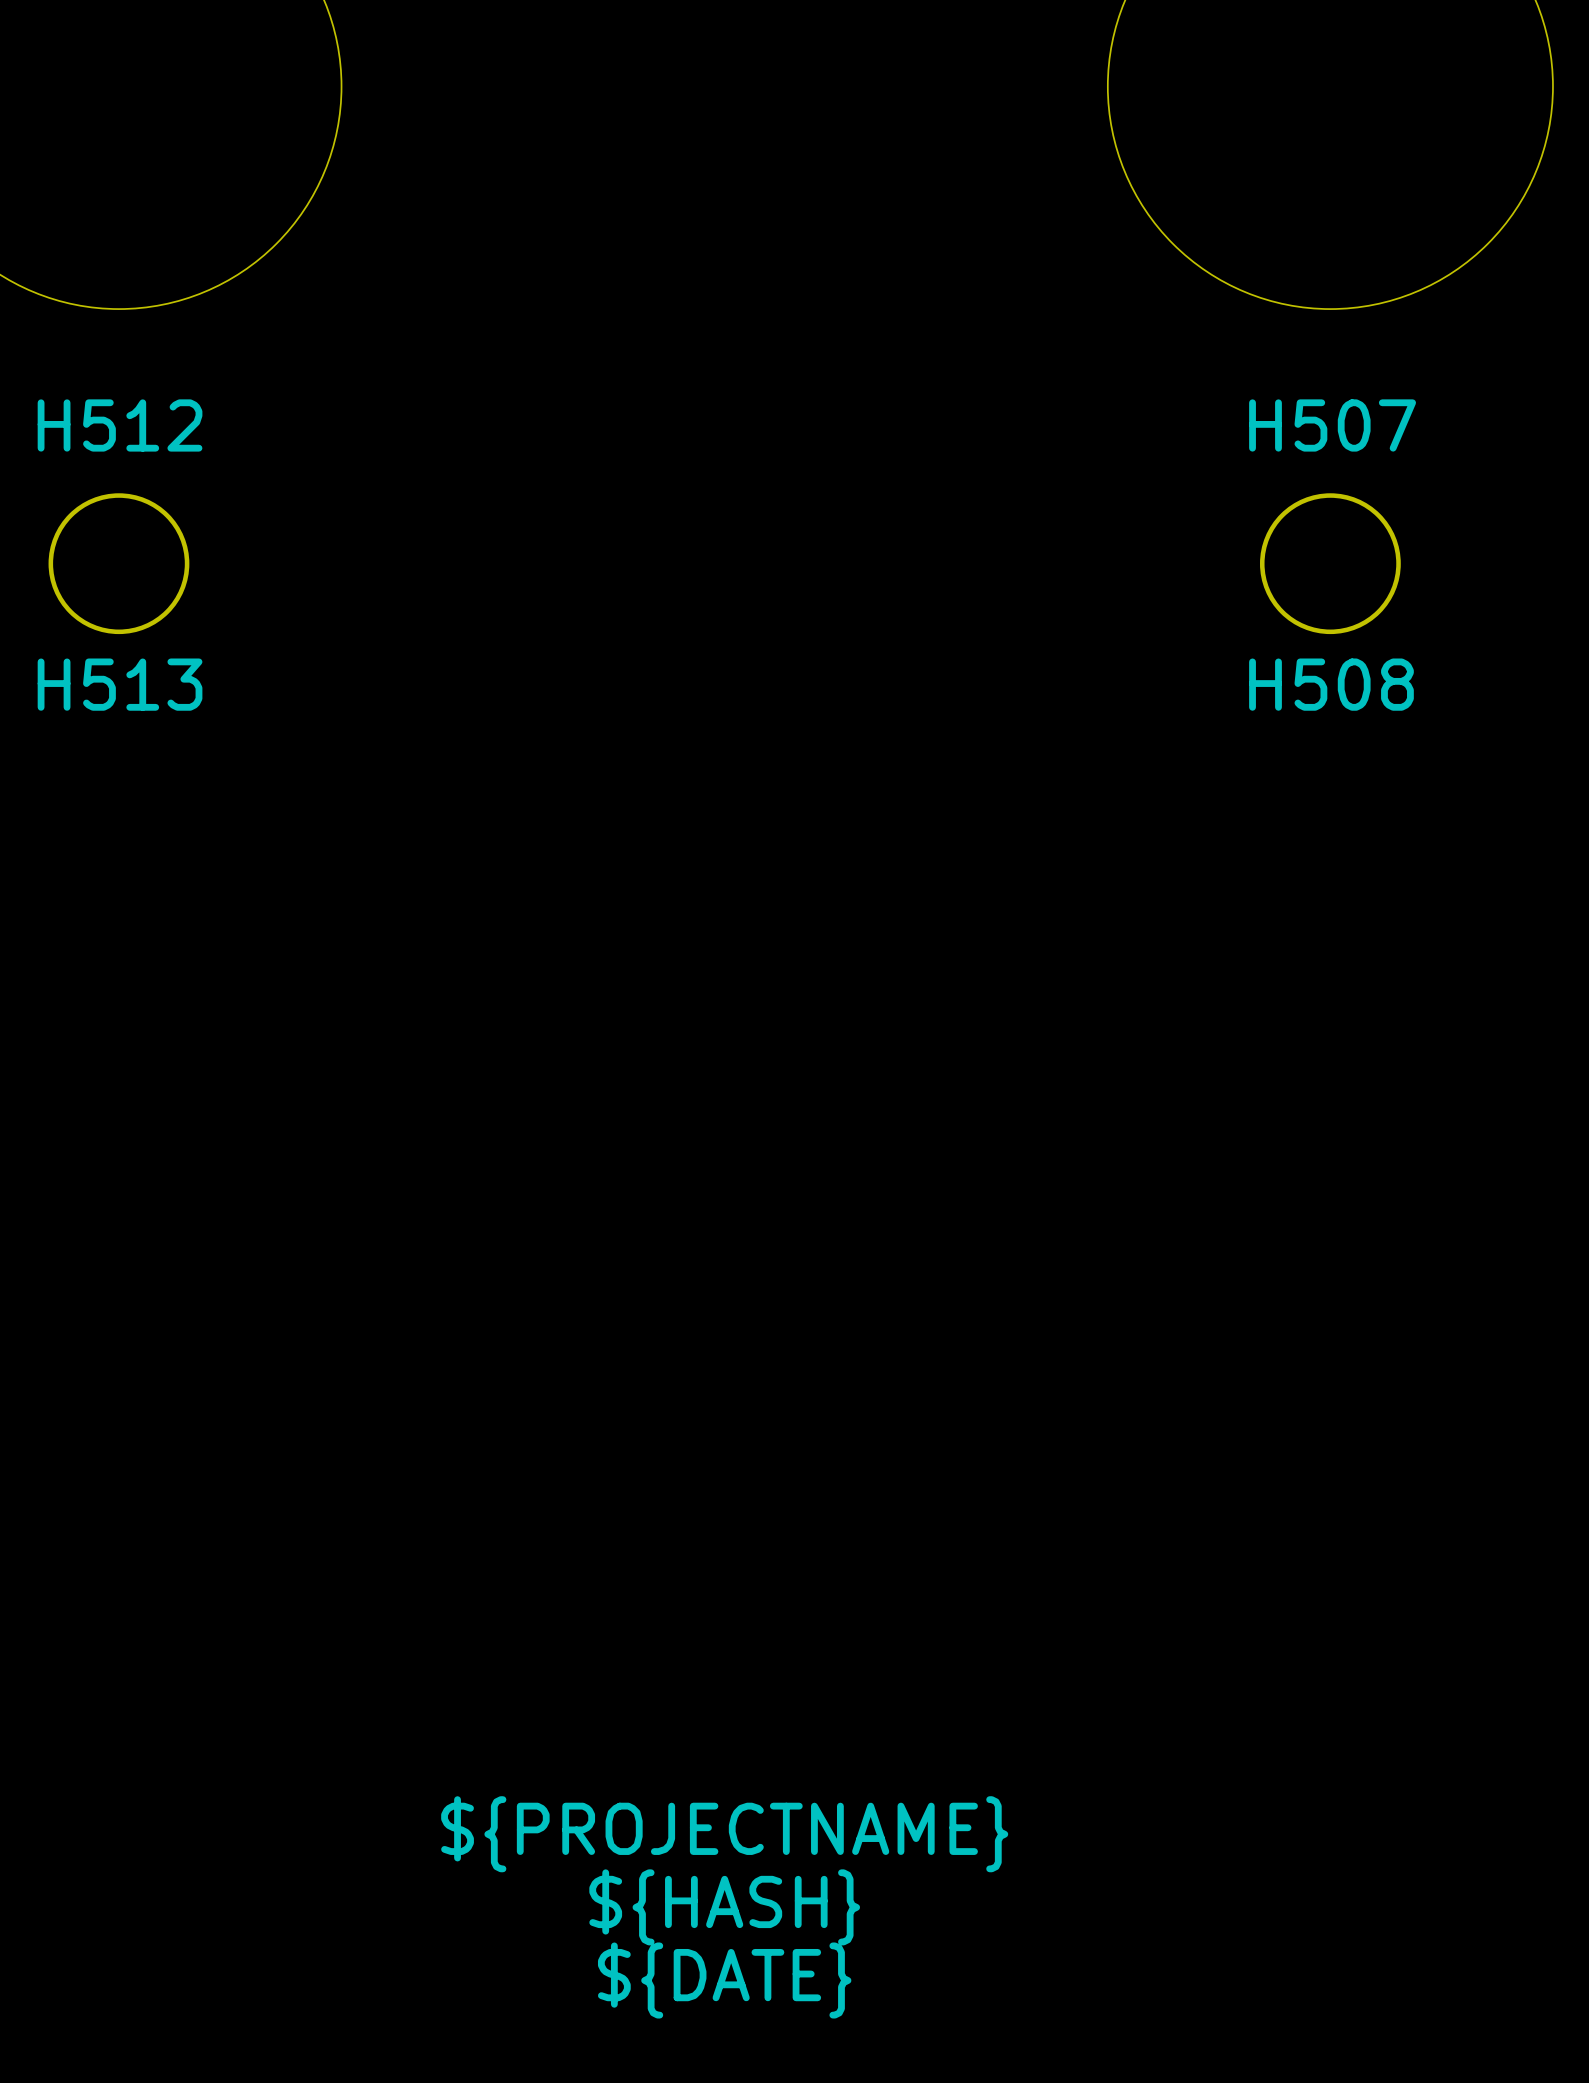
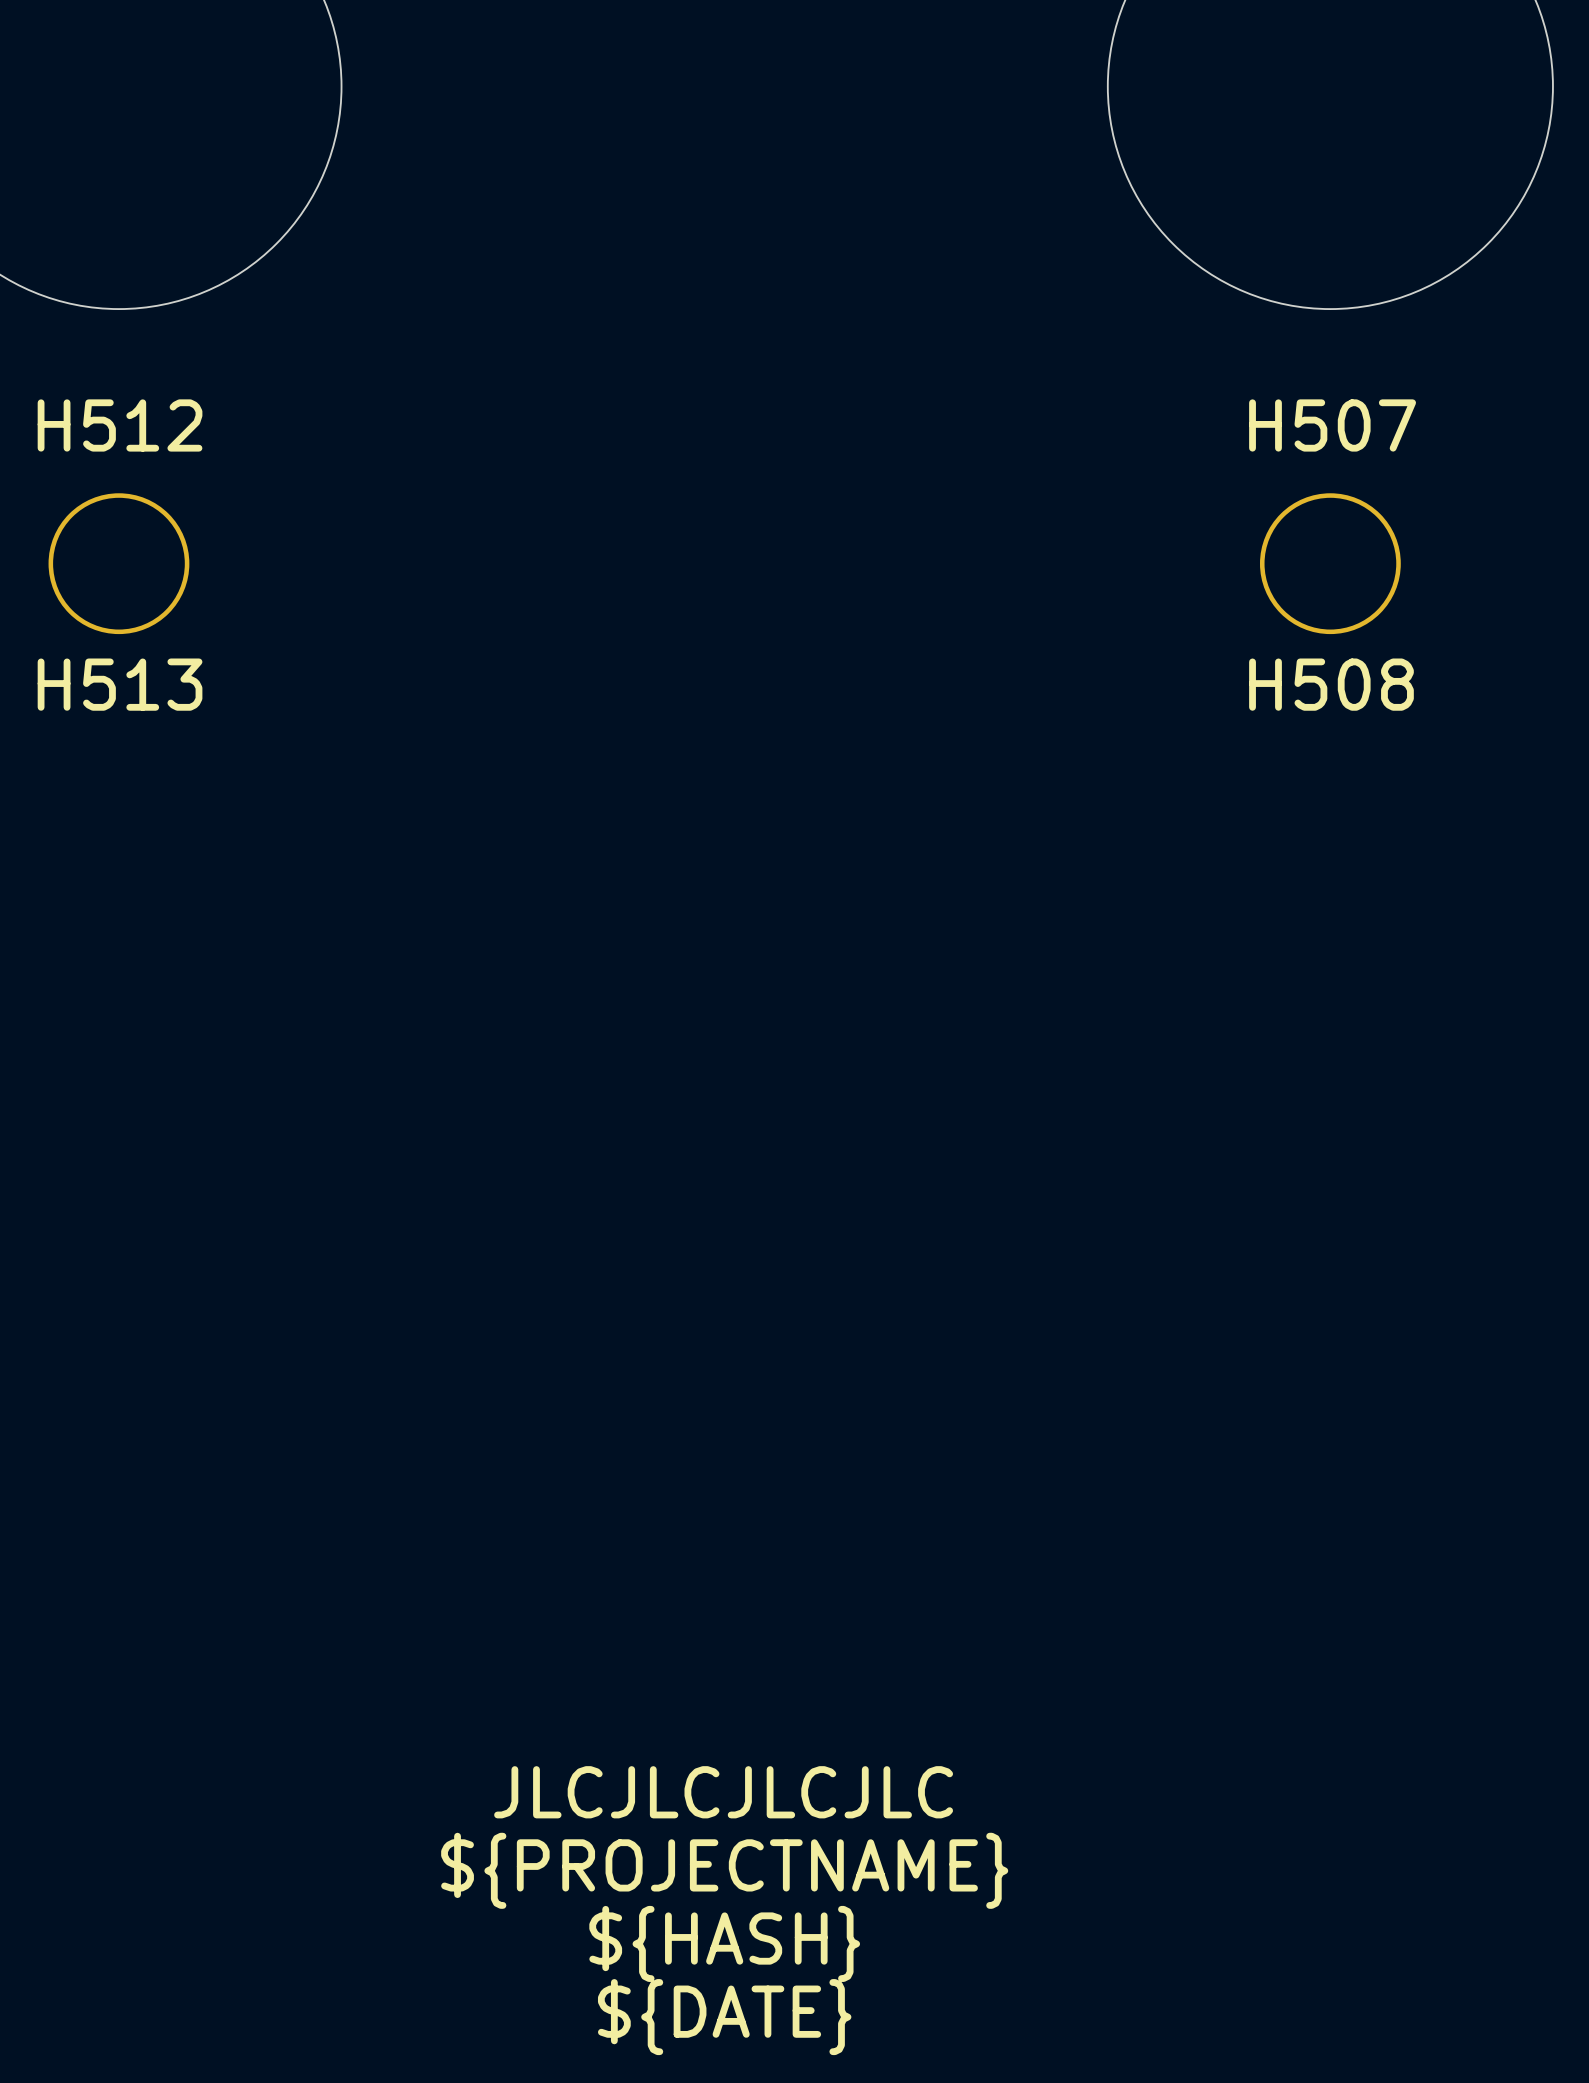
text: none -> JLCJLCJLCJLC (723, 1792)
text position: ${PROJECTNAME} (724, 1834) -> ${PROJECTNAME} (724, 1870)
text position: ${HASH} (724, 1907) -> ${HASH} (724, 1943)
text position: ${DATE} (724, 1980) -> ${DATE} (724, 2017)

